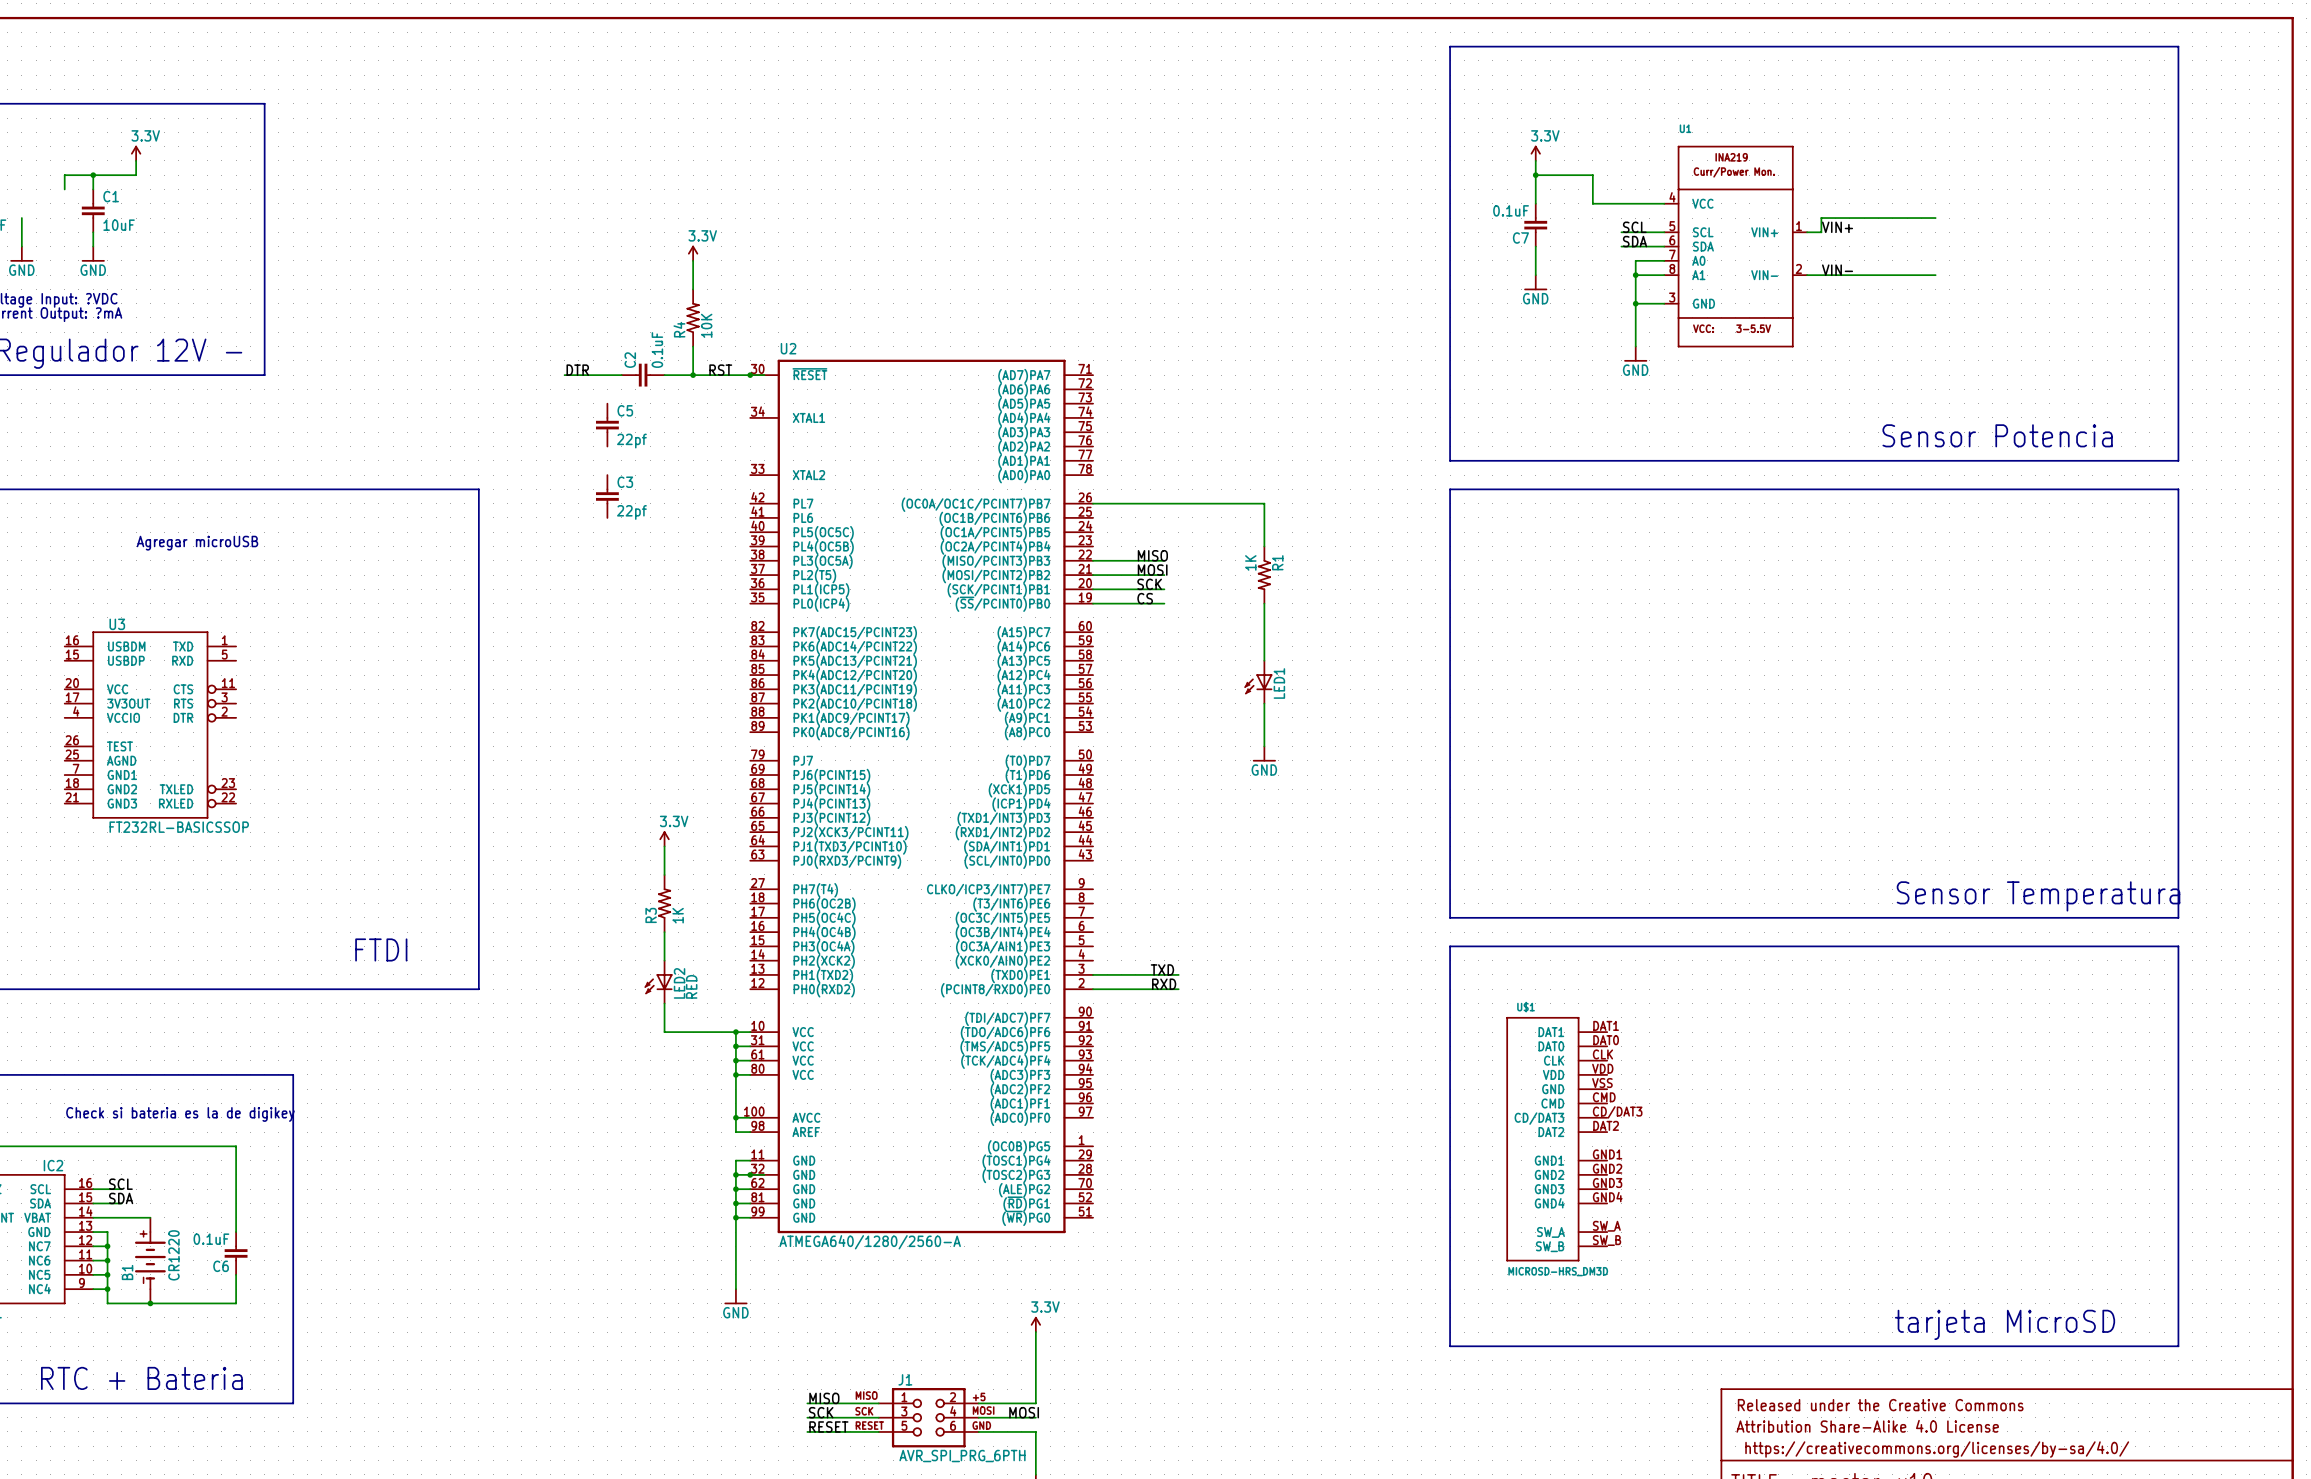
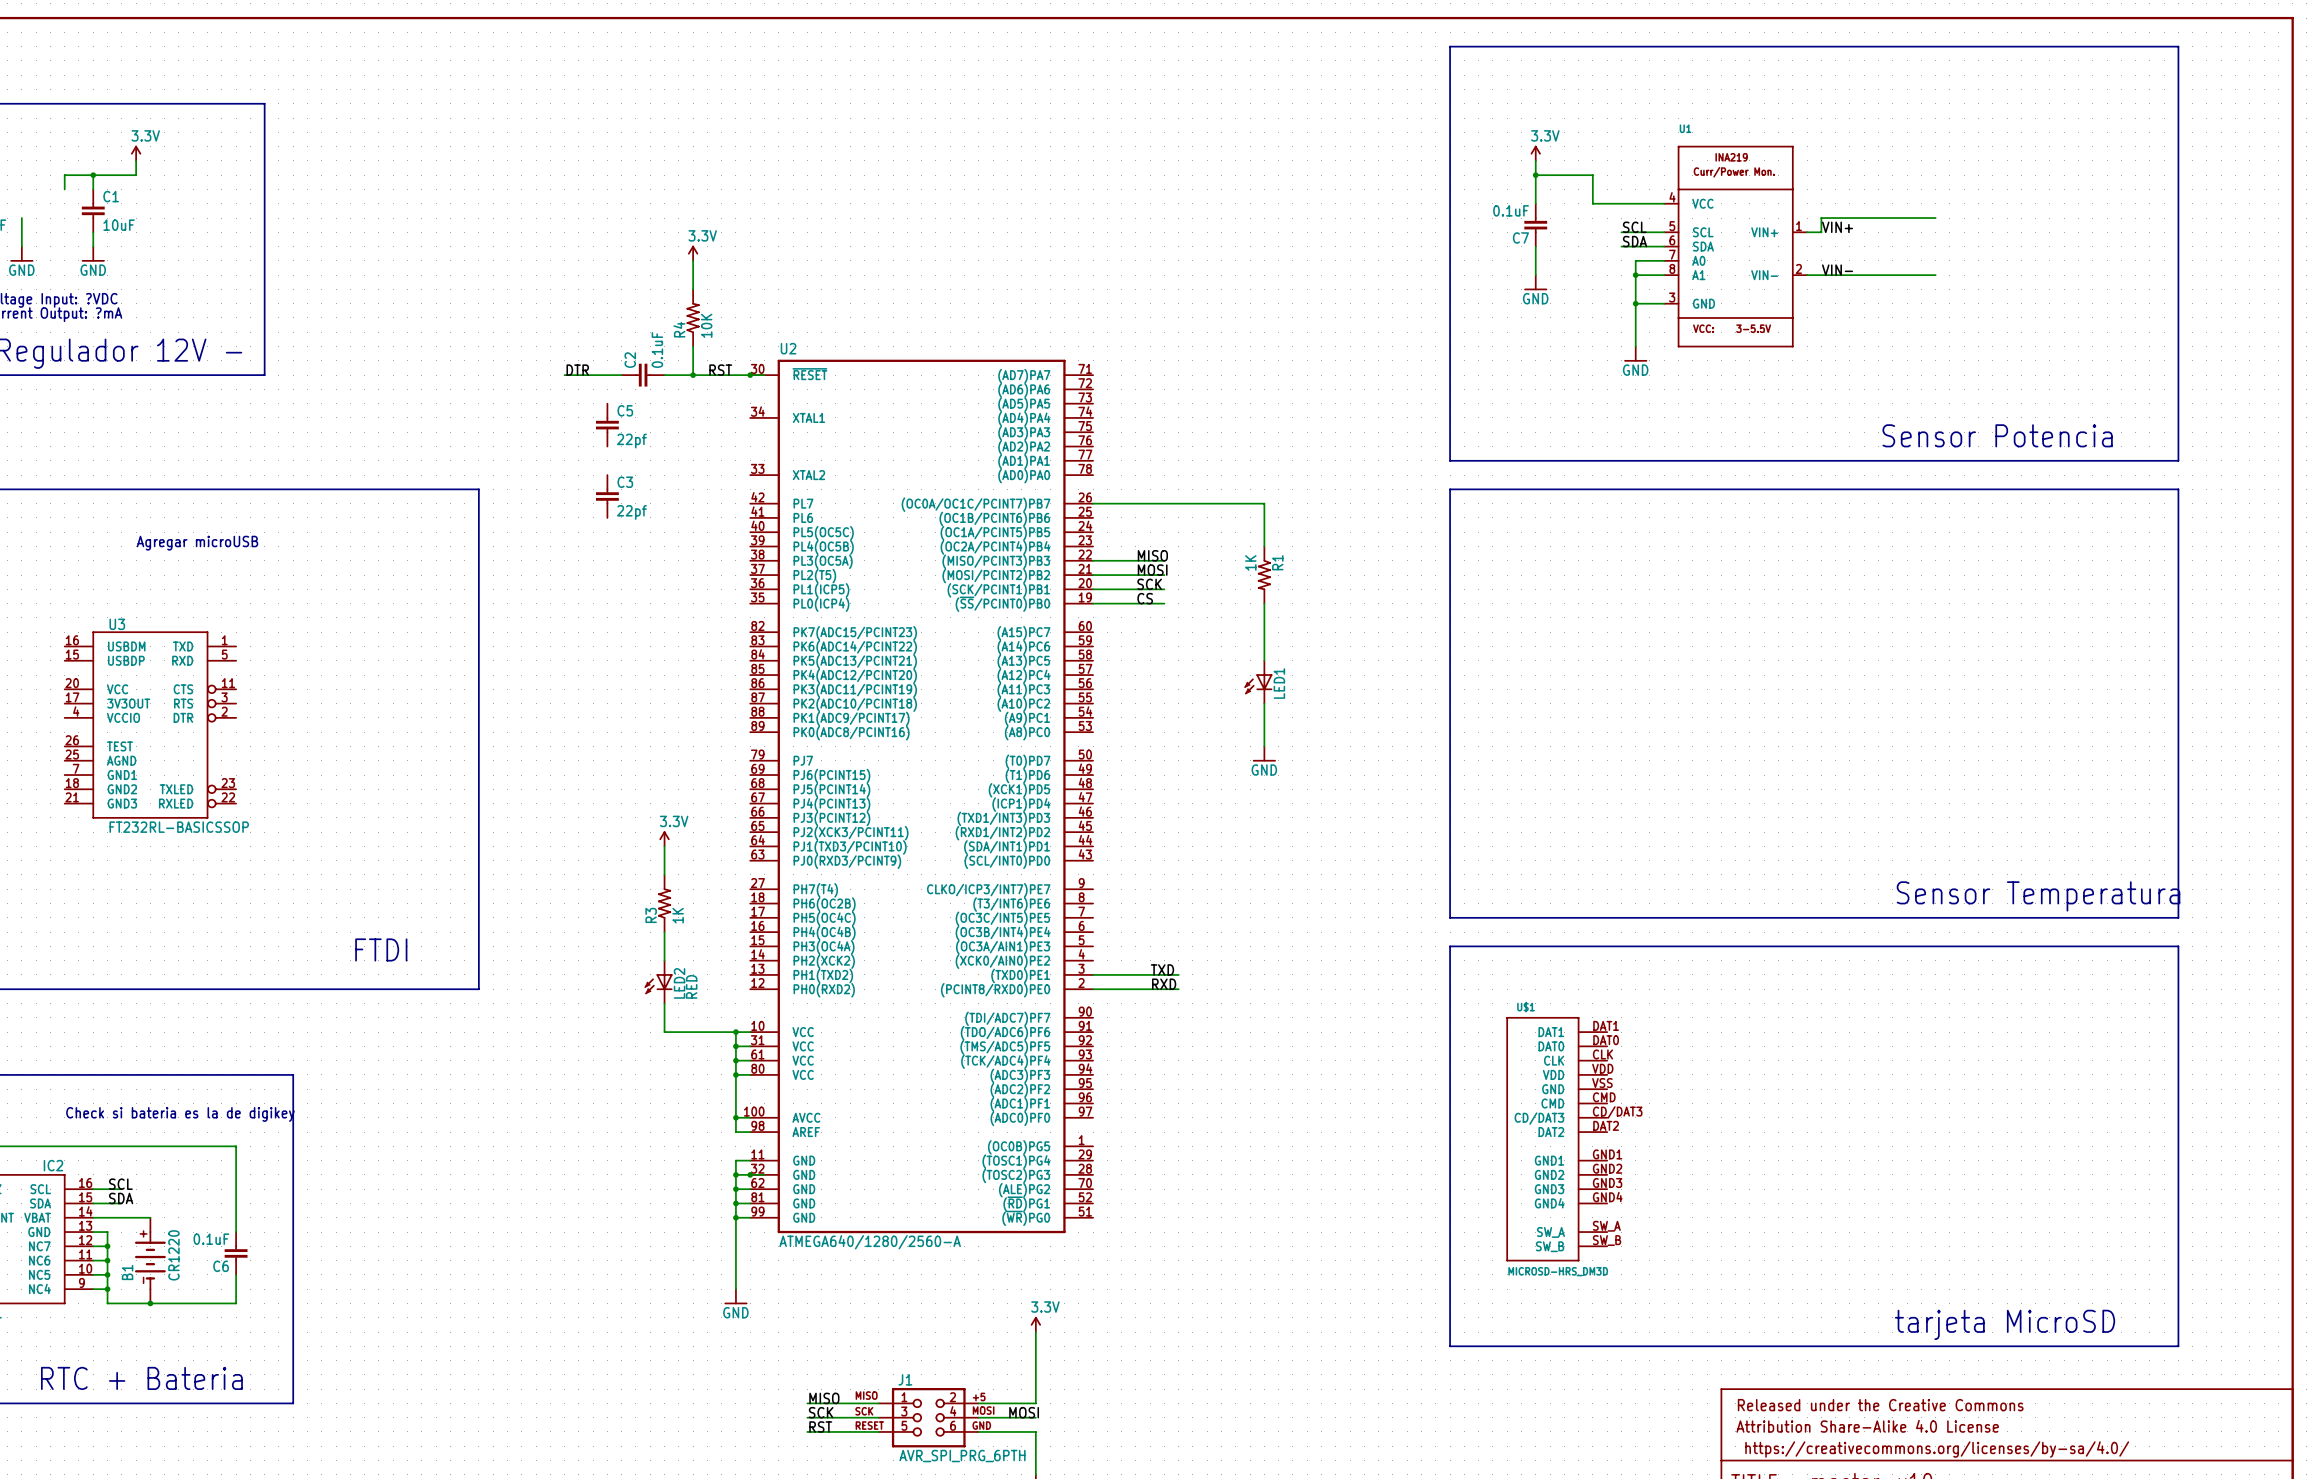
label: RESET (828, 1426) -> RST (820, 1426)

